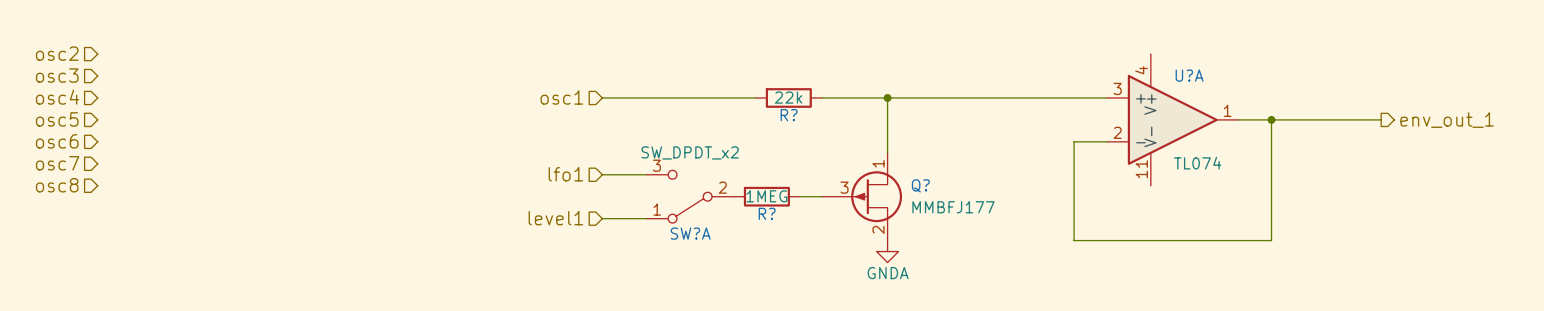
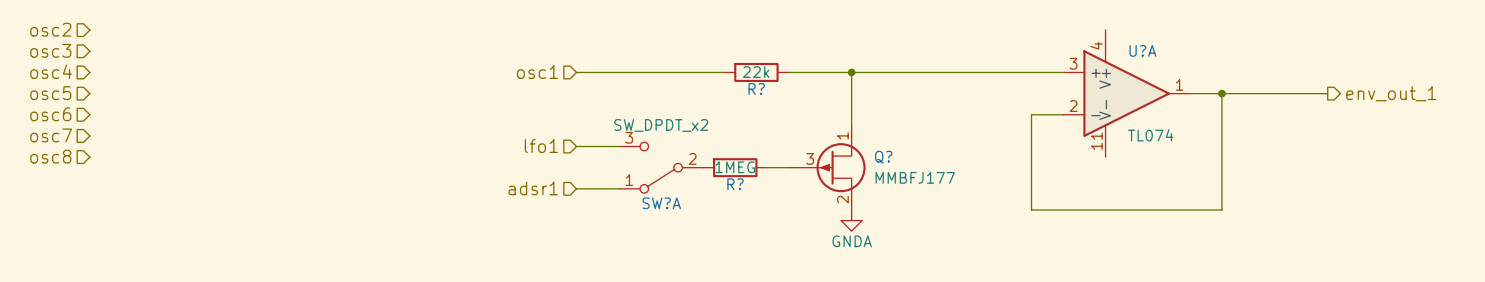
hierarchical label: level1 (555, 218) -> adsr1 (533, 188)

